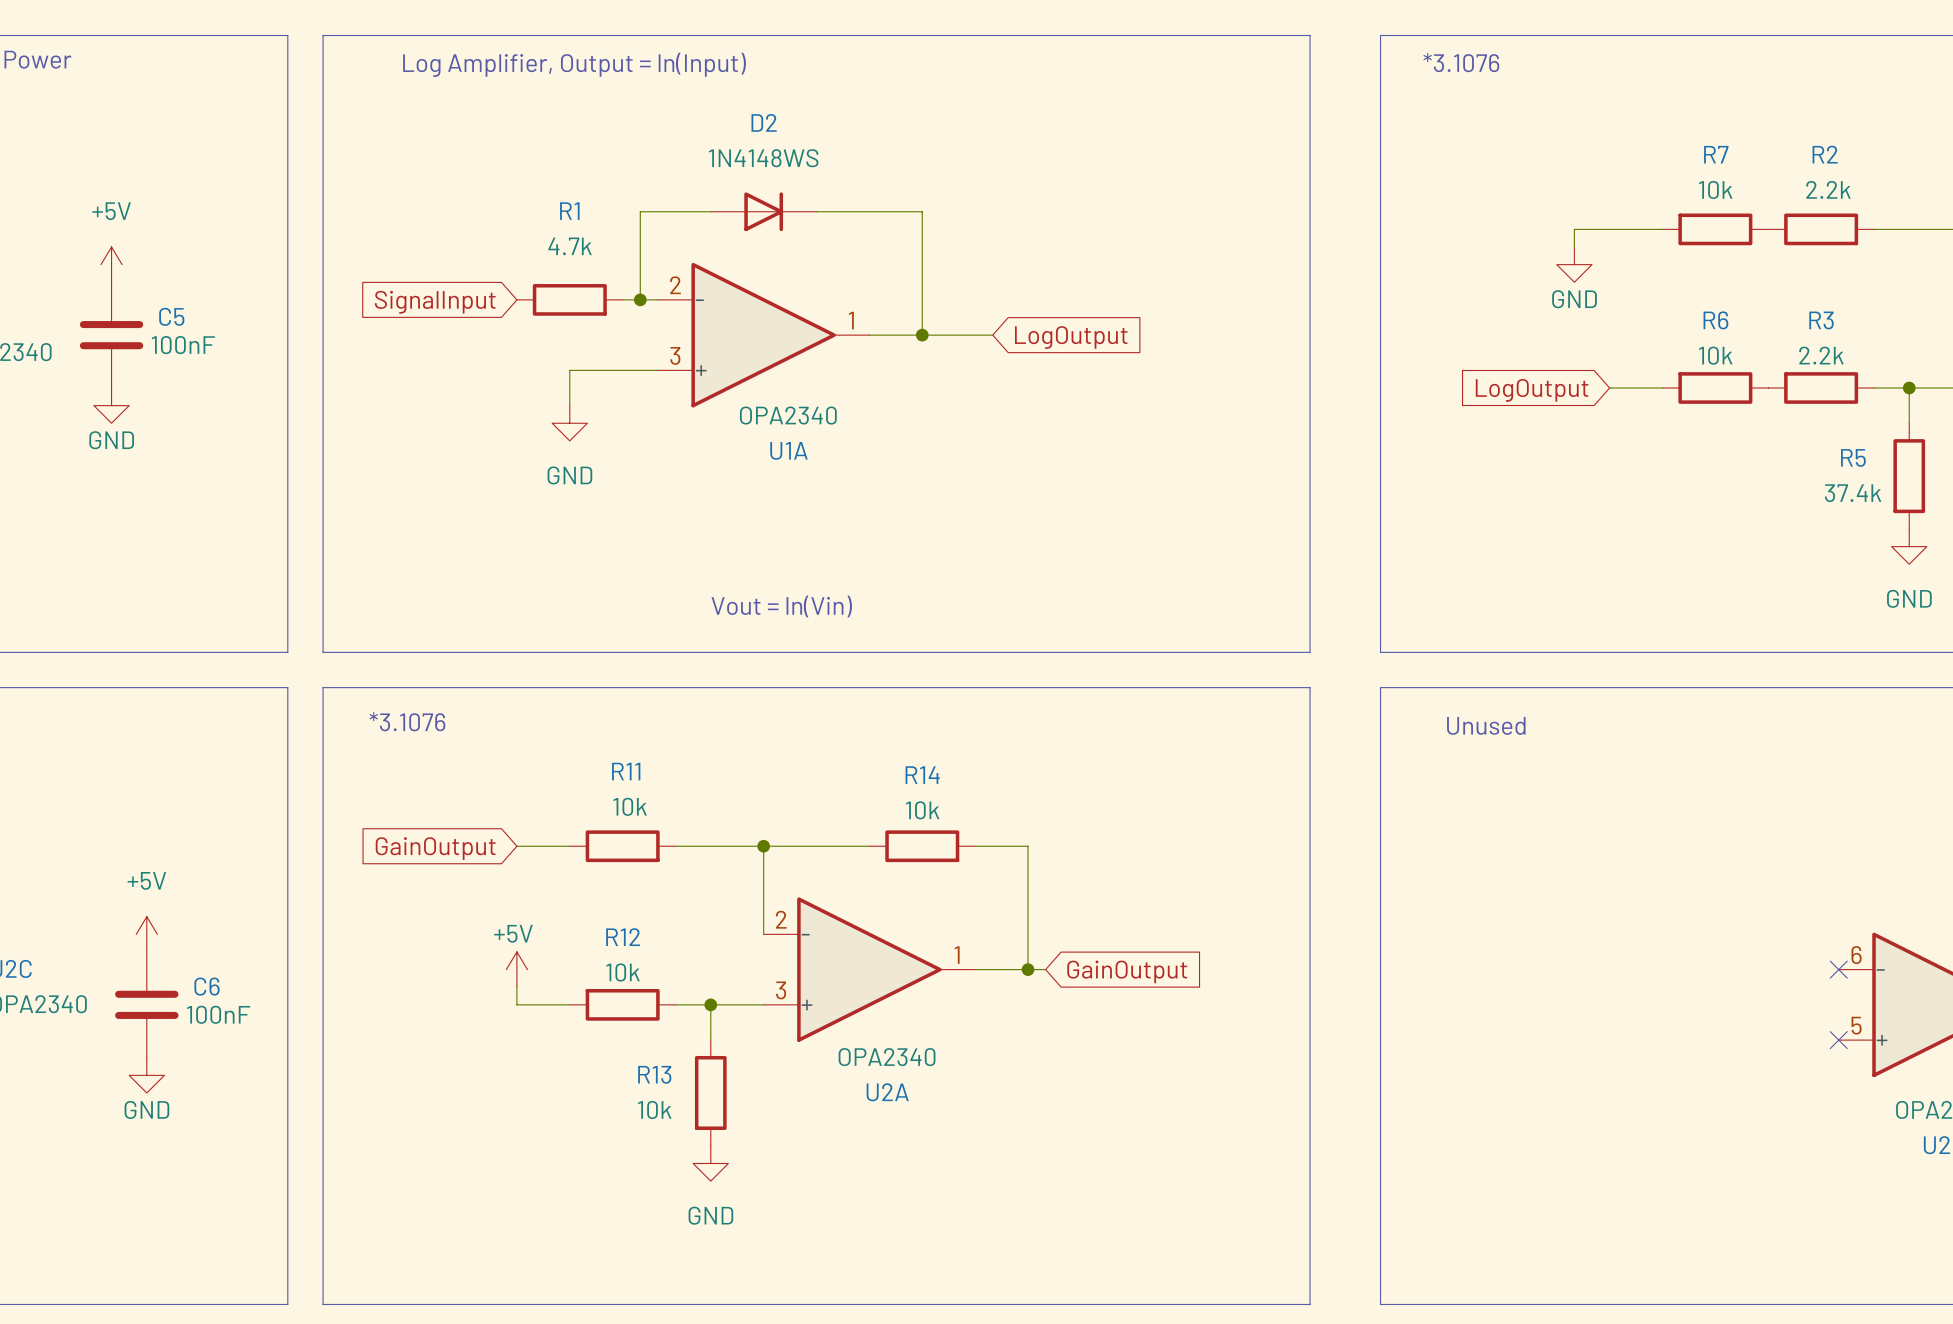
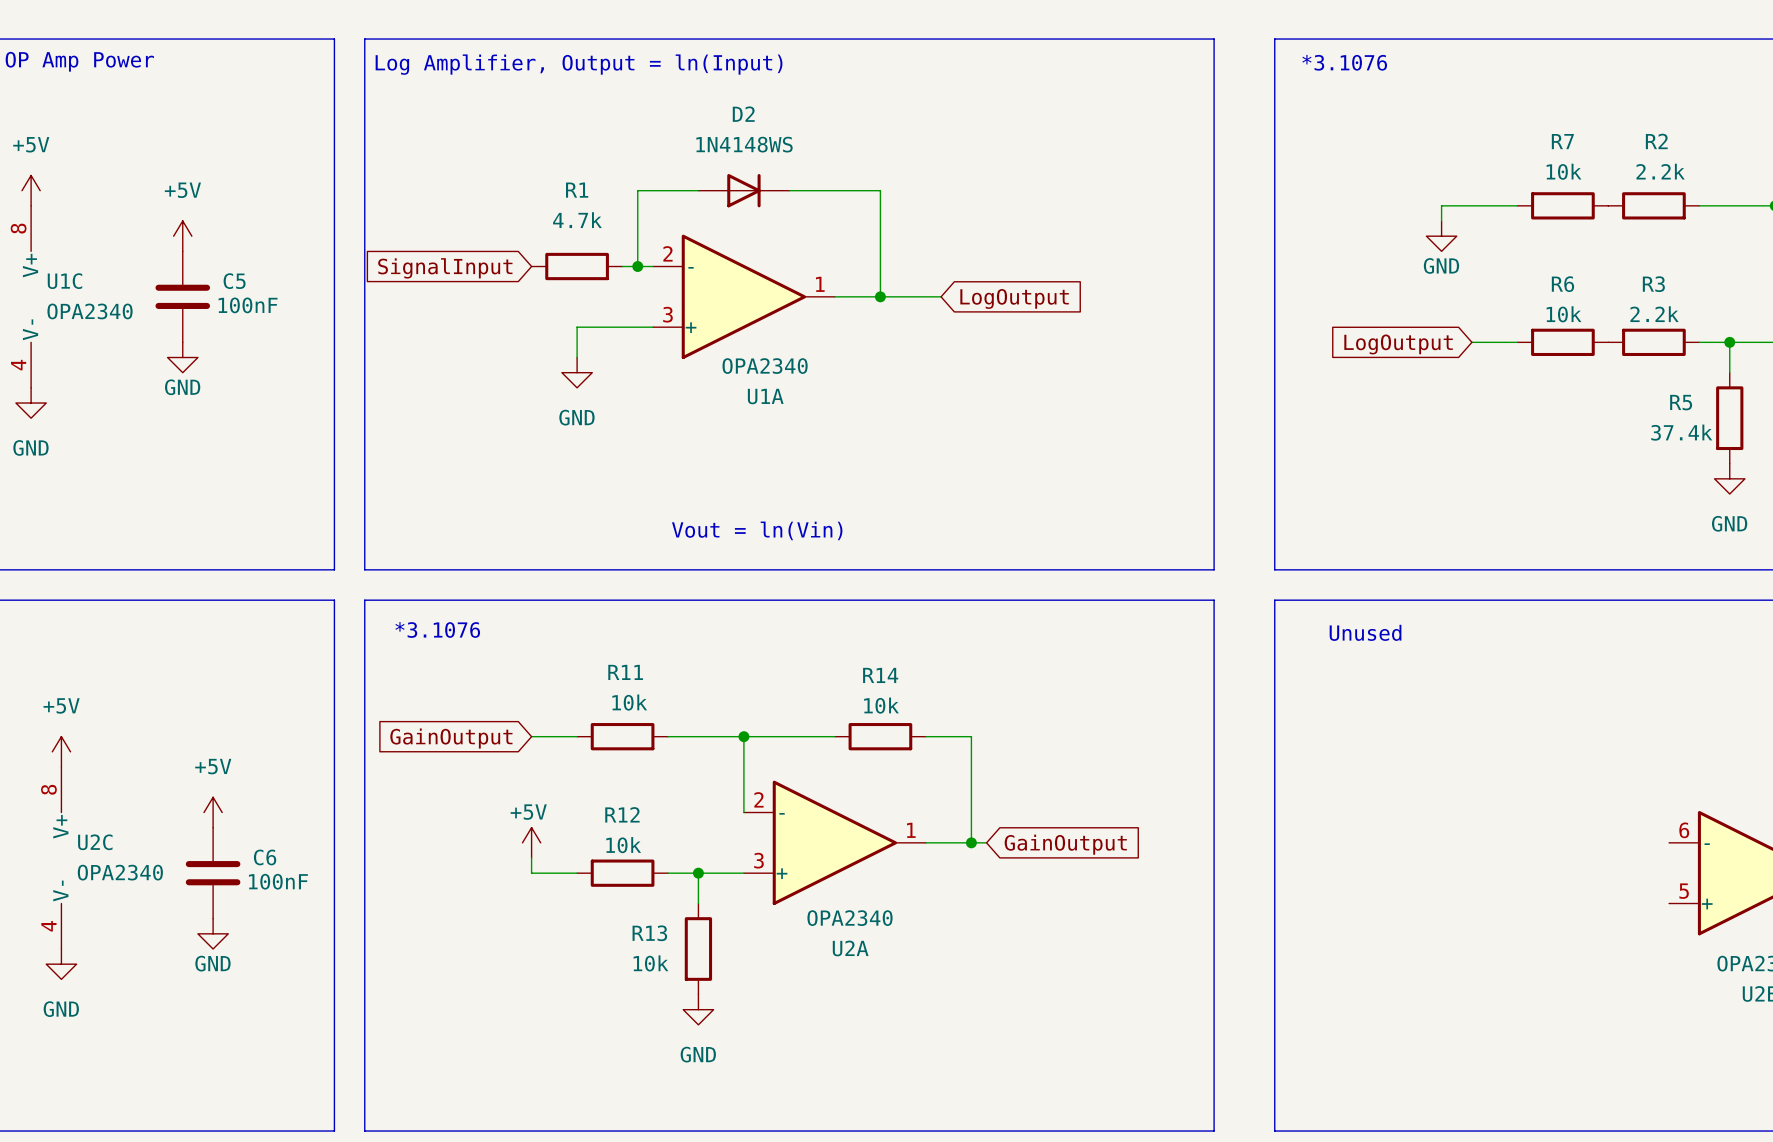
no-connect mark: (1838, 969) -> none
no-connect mark: (1838, 1040) -> none

